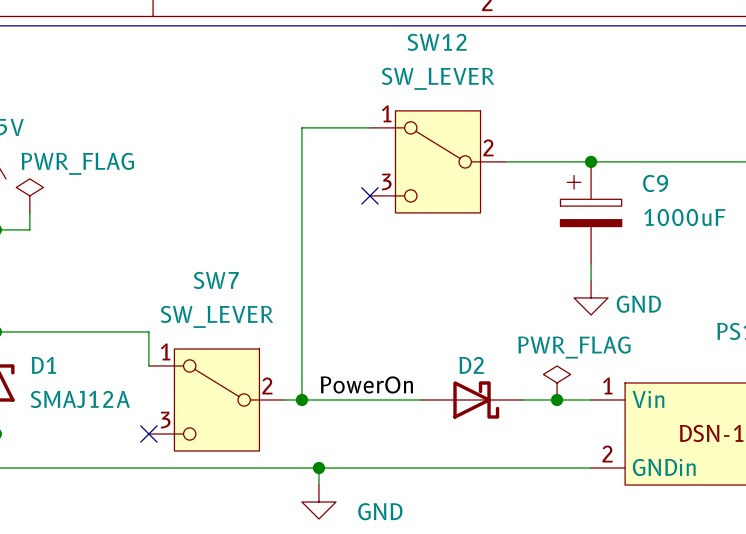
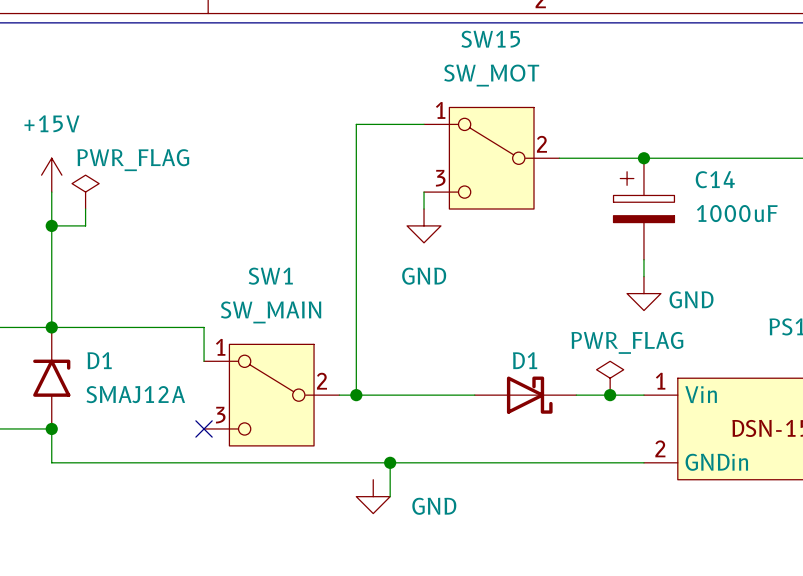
SW12 name: SW12 (437, 42) -> SW15 (490, 39)
SW12 value: SW_LEVER (438, 78) -> SW_MOT (491, 75)
C9 name: C9 (655, 183) -> C14 (715, 179)
no-connect mark: (369, 195) -> none
power symbol: none -> GND (424, 225)
SW7 name: SW7 (216, 280) -> SW1 (270, 276)
SW7 value: SW_LEVER (217, 316) -> SW_MAIN (271, 312)
D2 name: D2 (471, 365) -> D1 (525, 360)
label: PowerOn (366, 384) -> none
wire: (318, 468) (318, 485) -> (424, 192) (424, 209)
junction position: (318, 468) -> (390, 462)
wire: none -> (390, 462) (390, 496)

